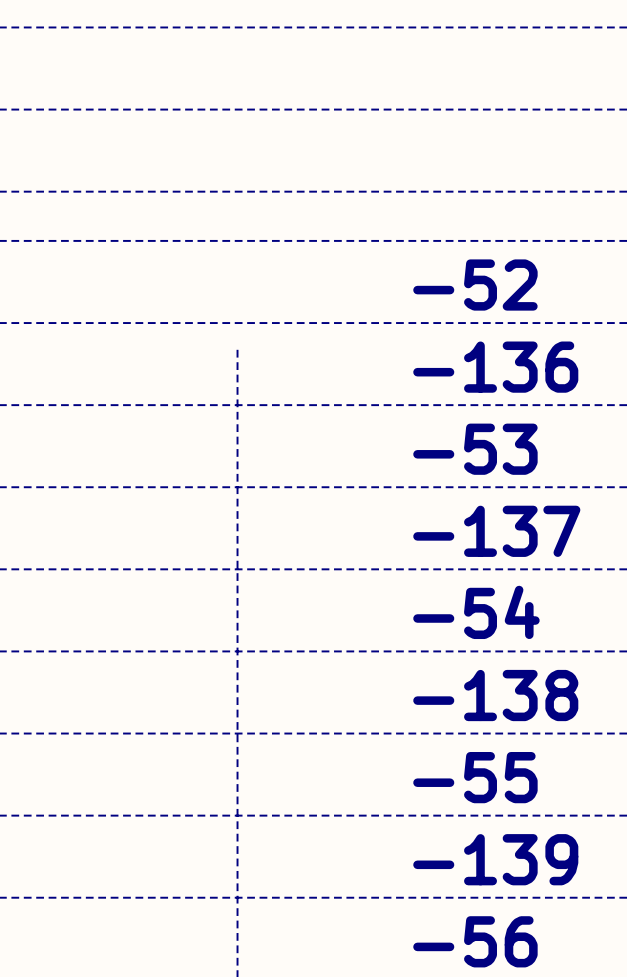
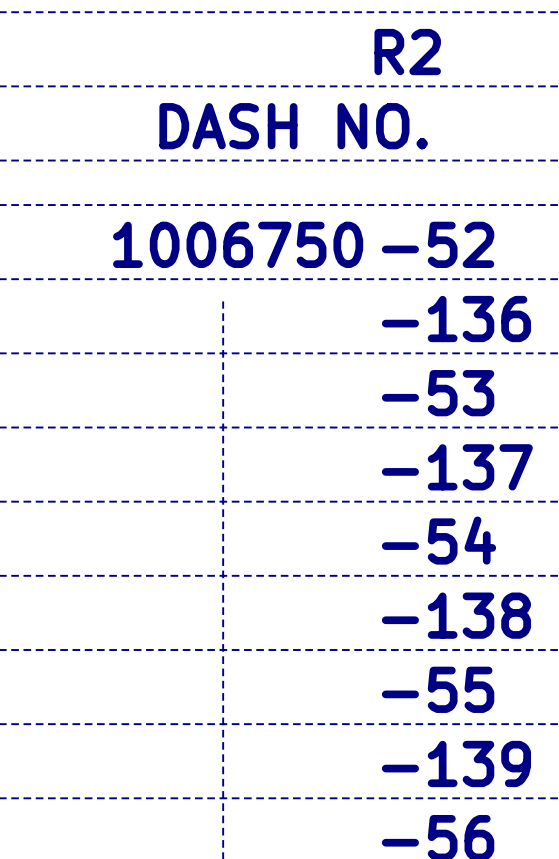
text: none -> R2 (407, 52)
text: none -> DASH NO. (293, 126)
text: none -> 1006750 (238, 244)

